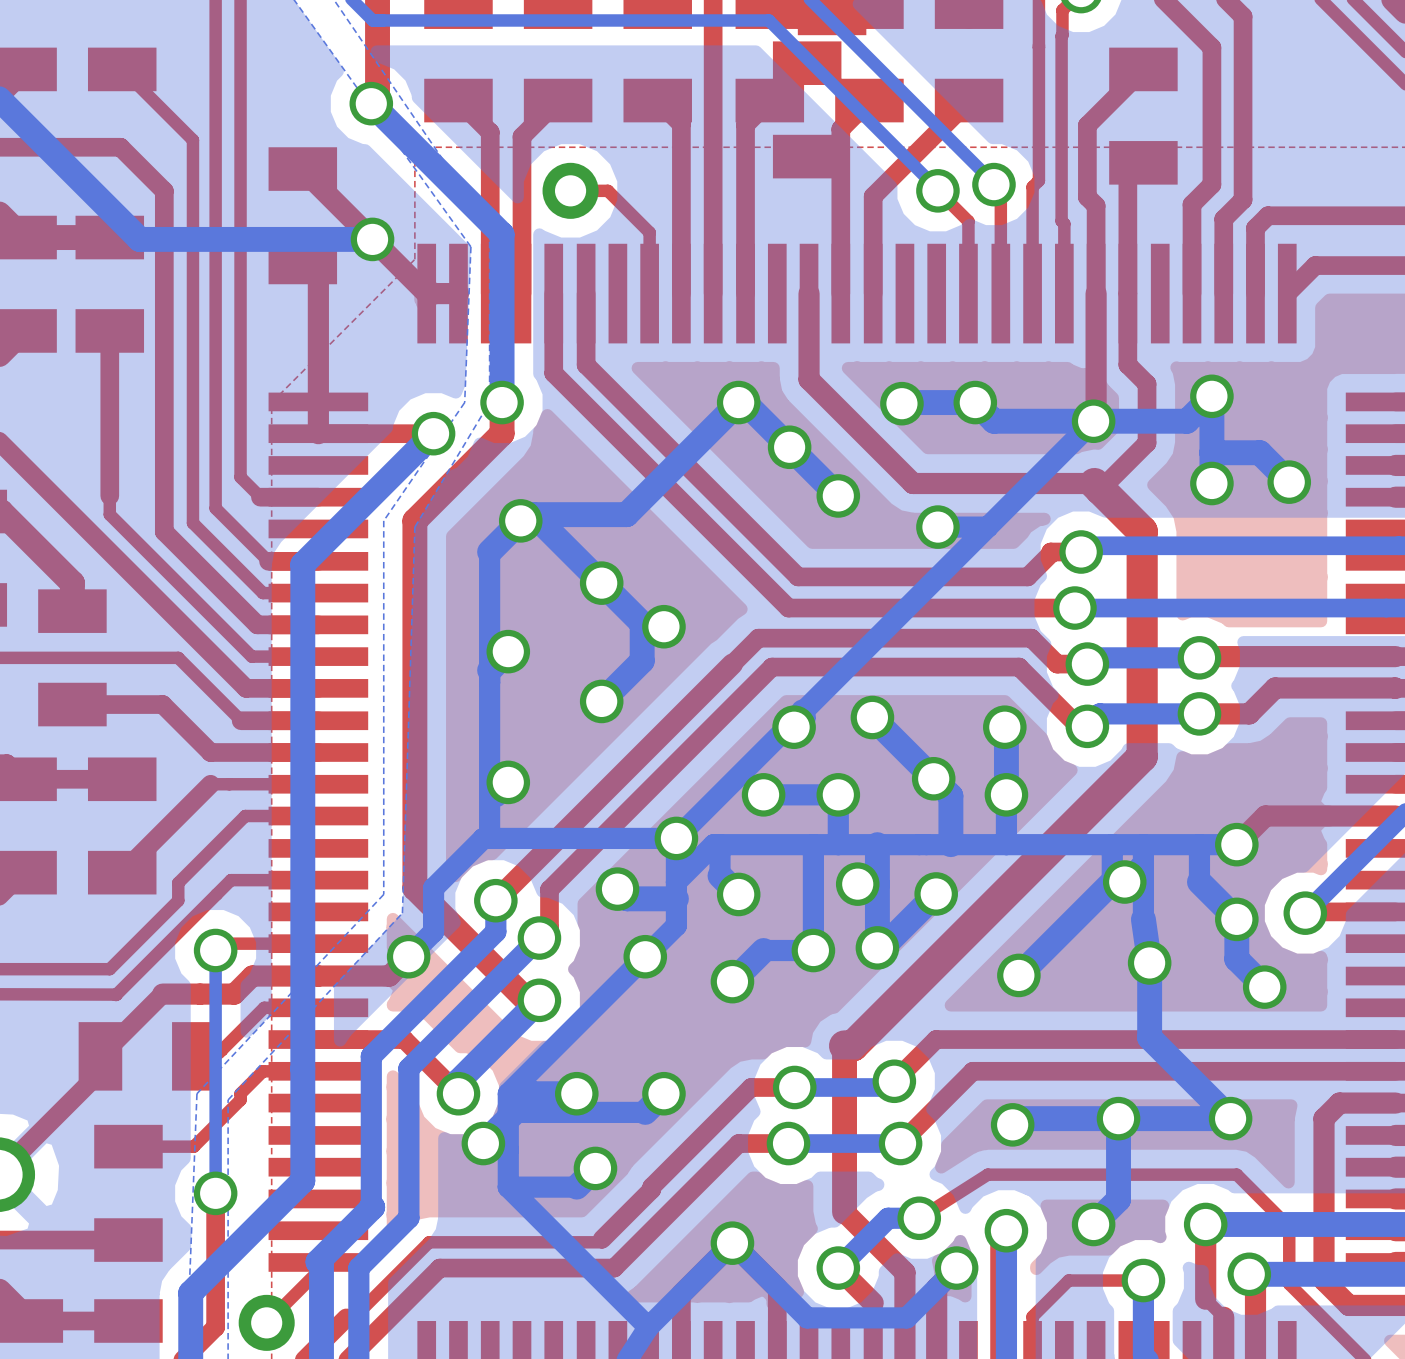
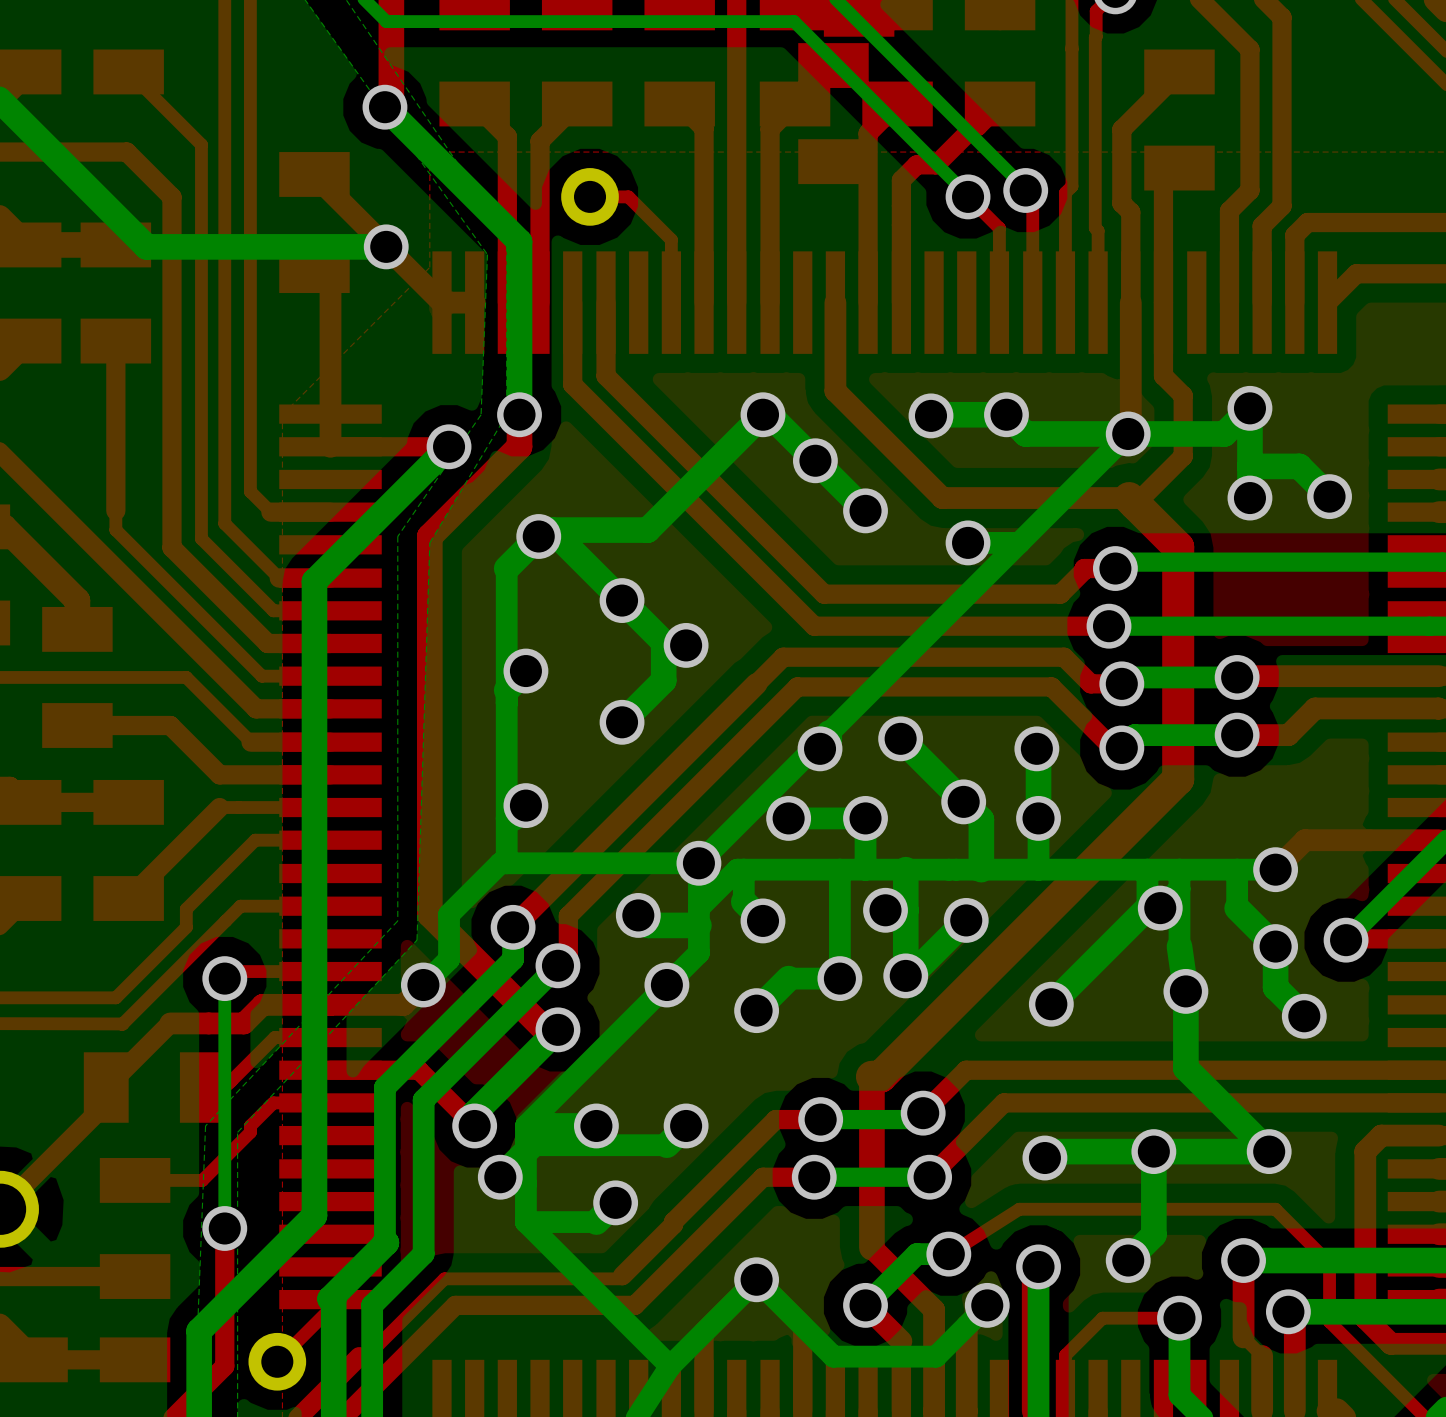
top track: (947, 122) (873, 196) -> (977, 126) (974, 126) (936, 164) (916, 164) (901, 180) (901, 202)

